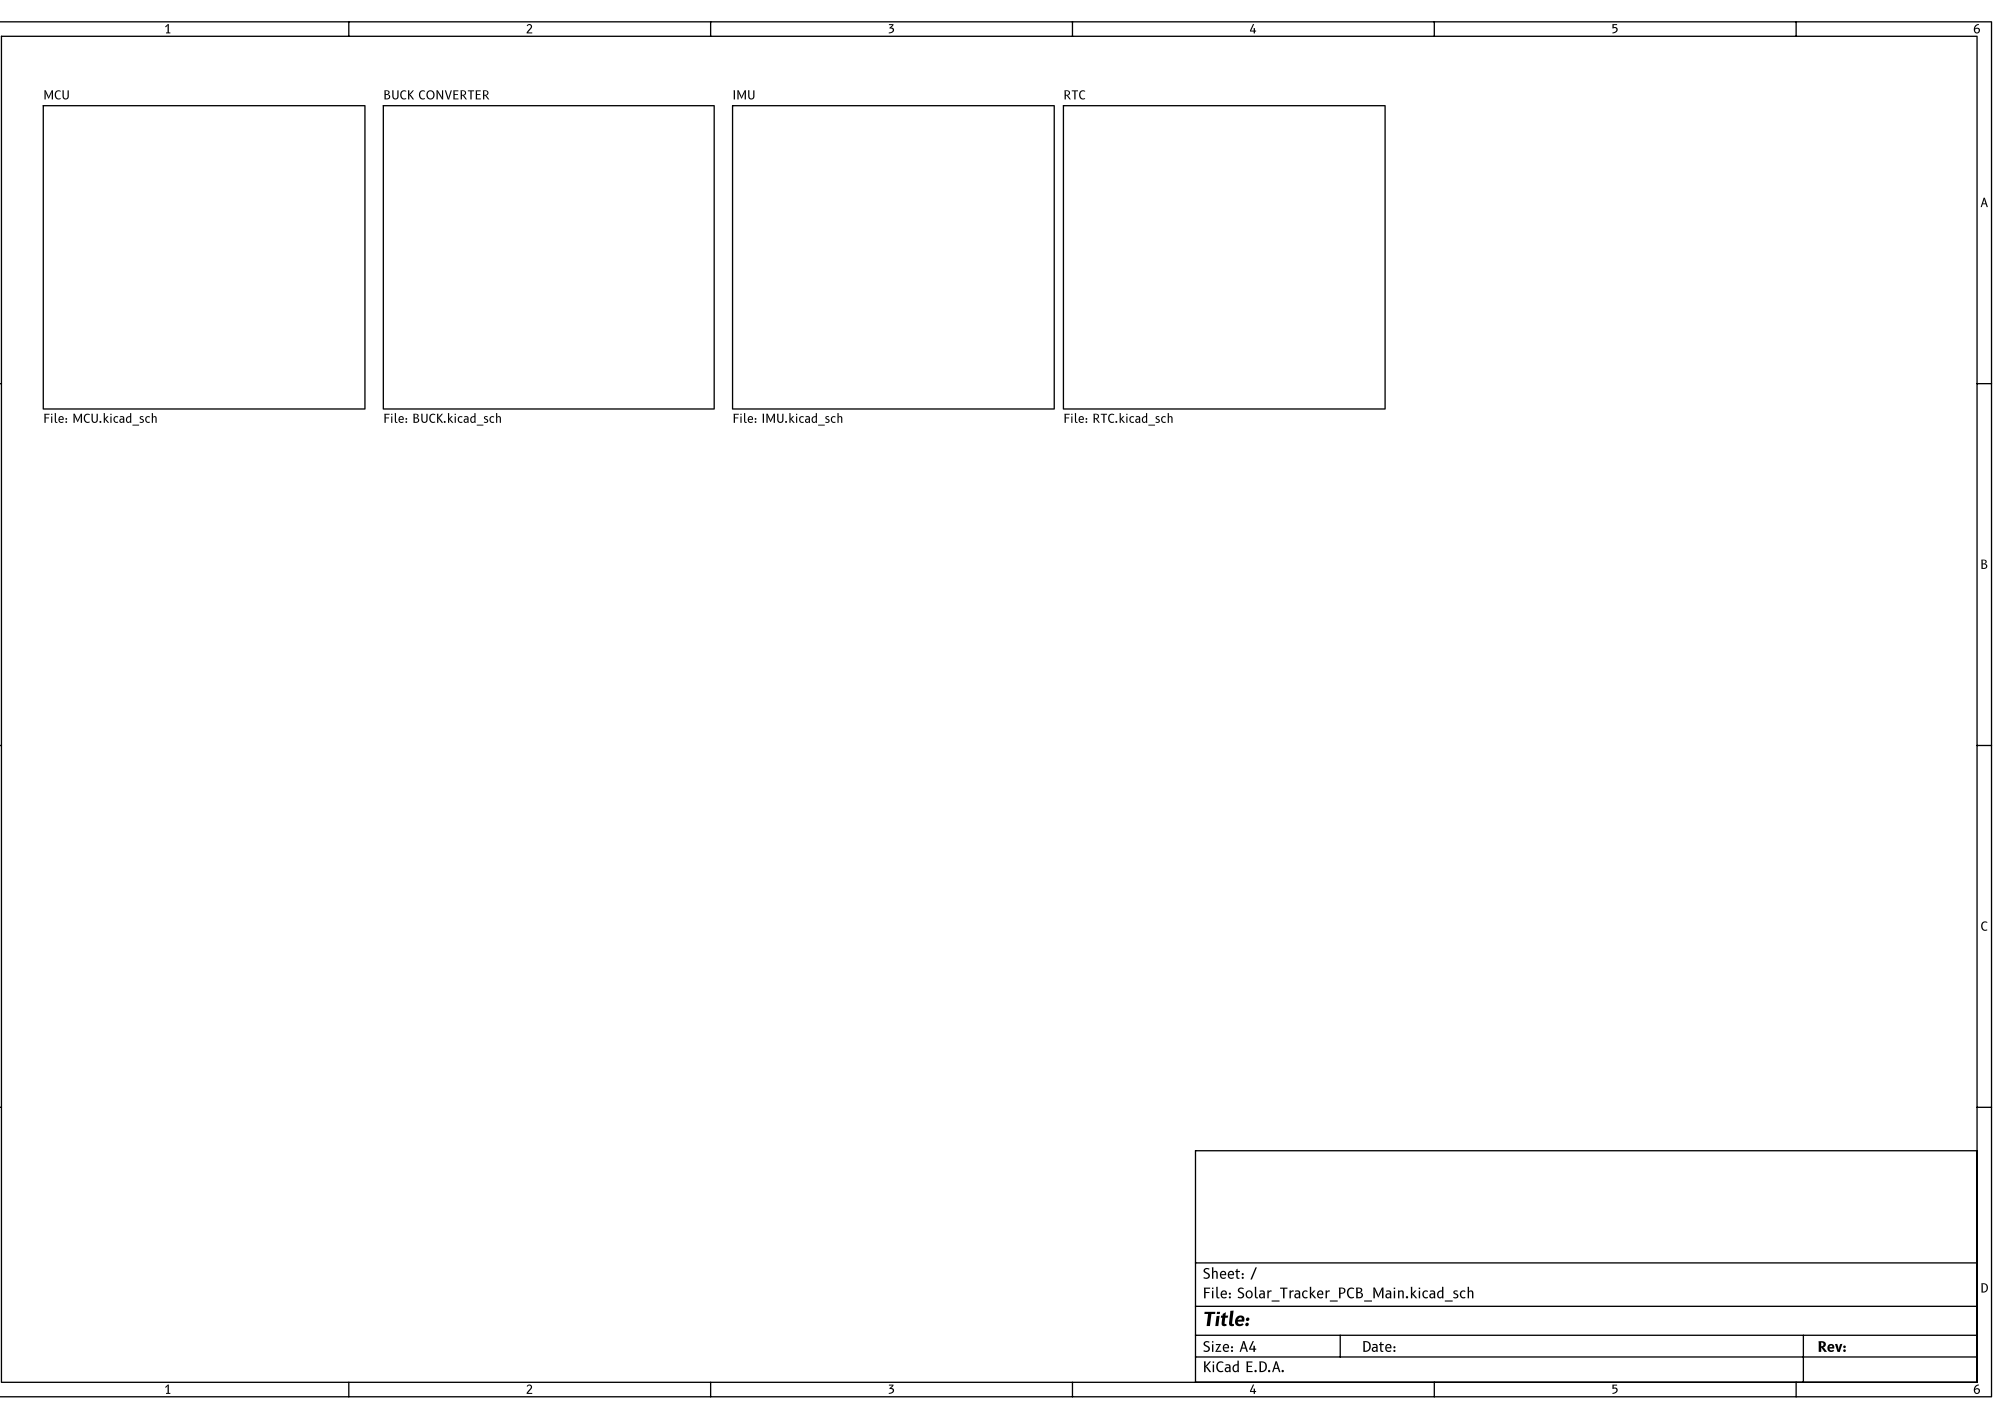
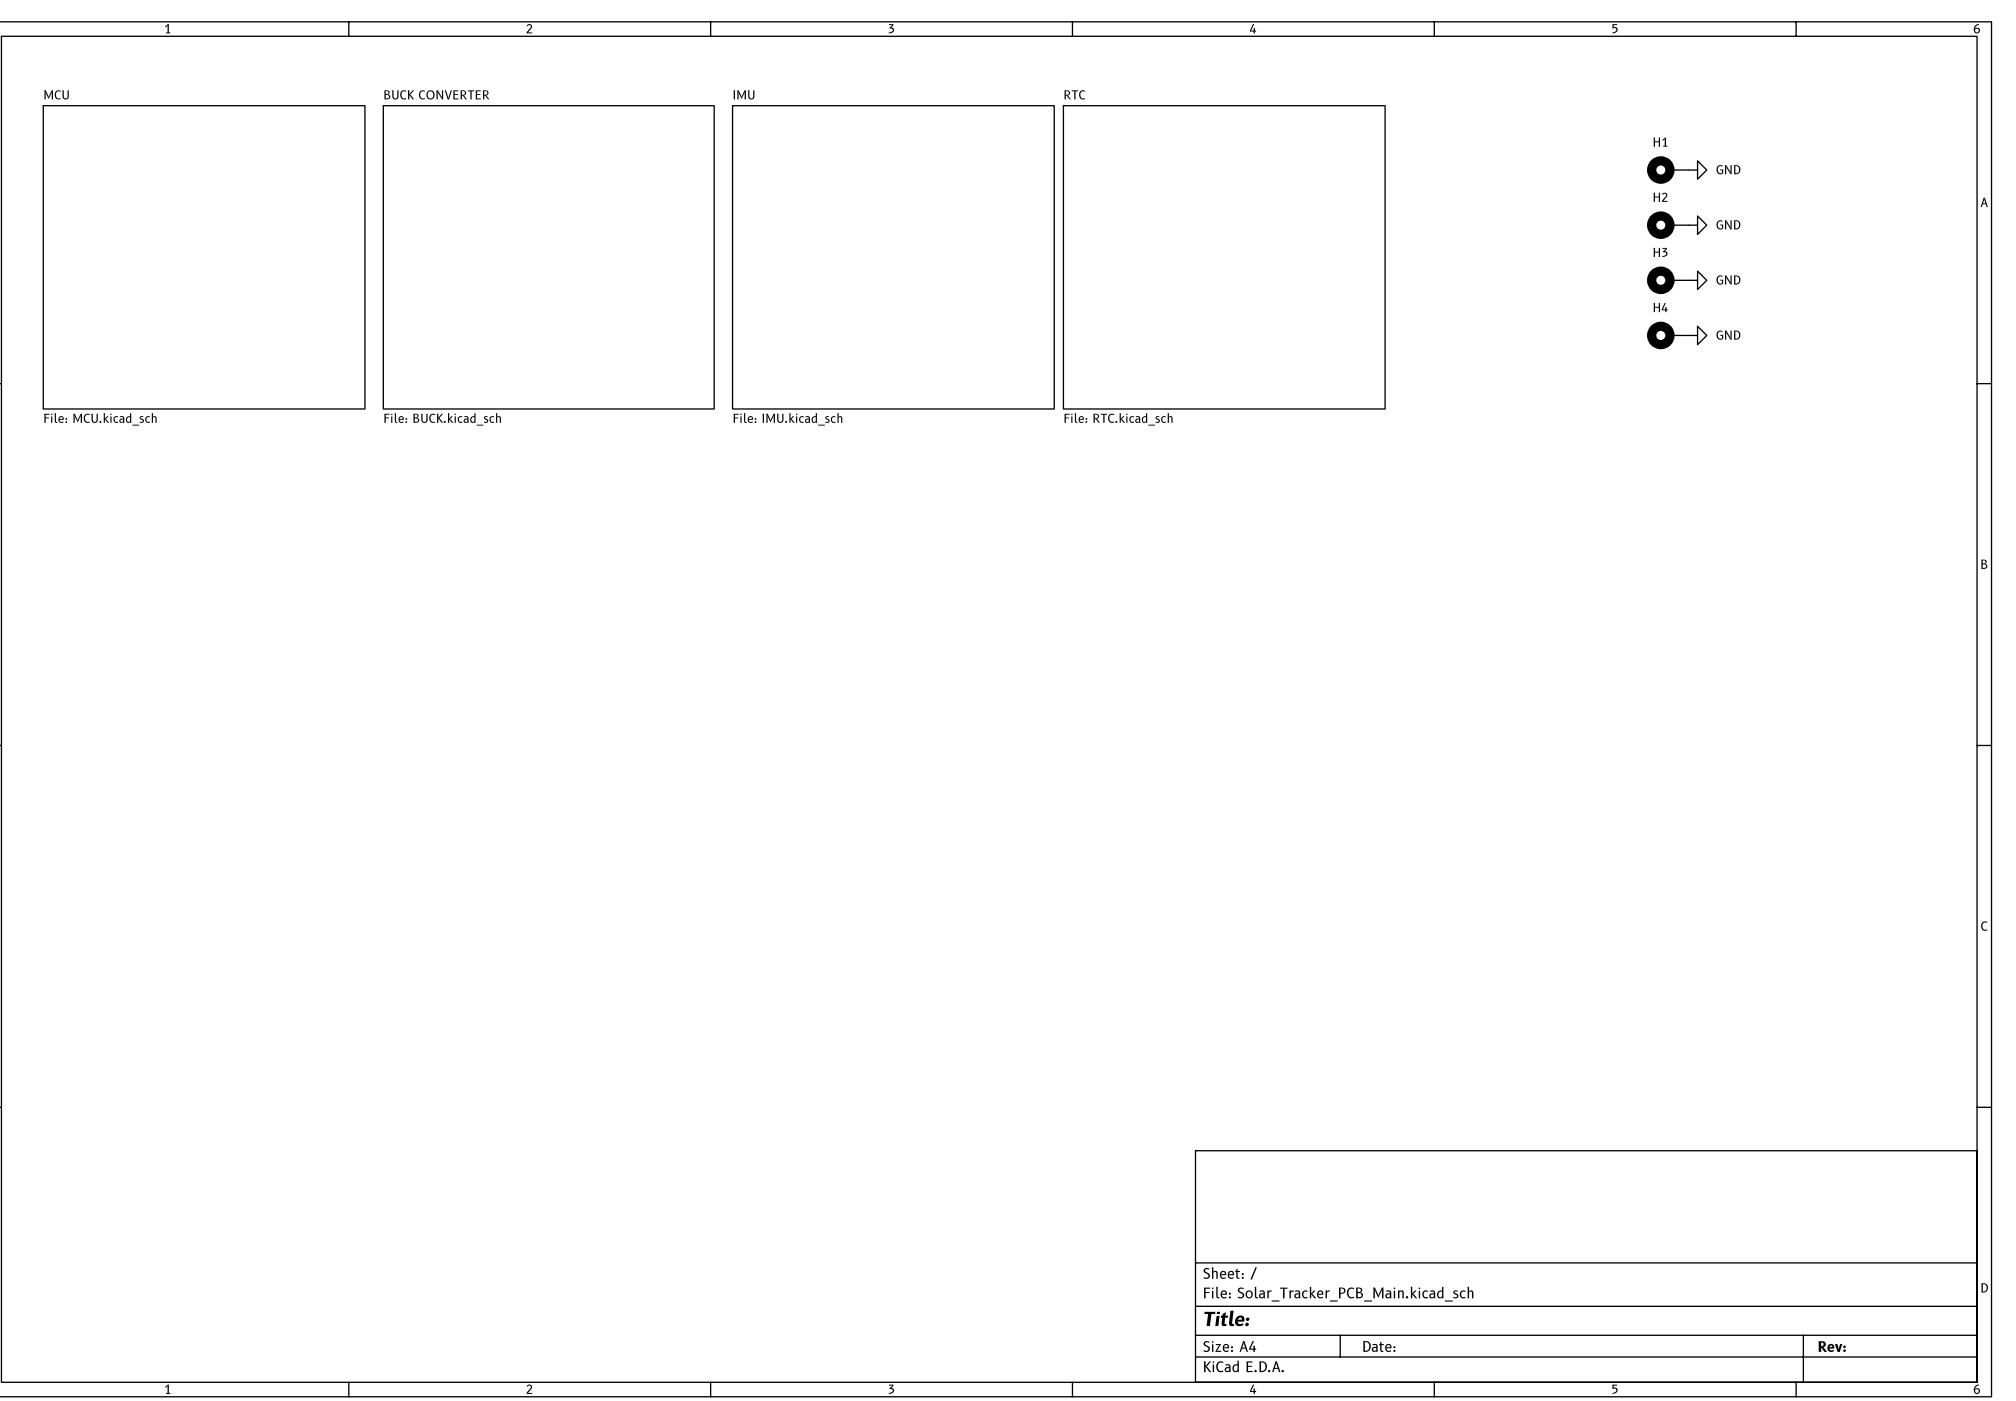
H1: none -> (1667, 170)
power symbol: none -> GND (1697, 170)
H2: none -> (1667, 225)
power symbol: none -> GND (1697, 225)
H3: none -> (1667, 280)
power symbol: none -> GND (1697, 280)
H4: none -> (1667, 335)
power symbol: none -> GND (1697, 335)

